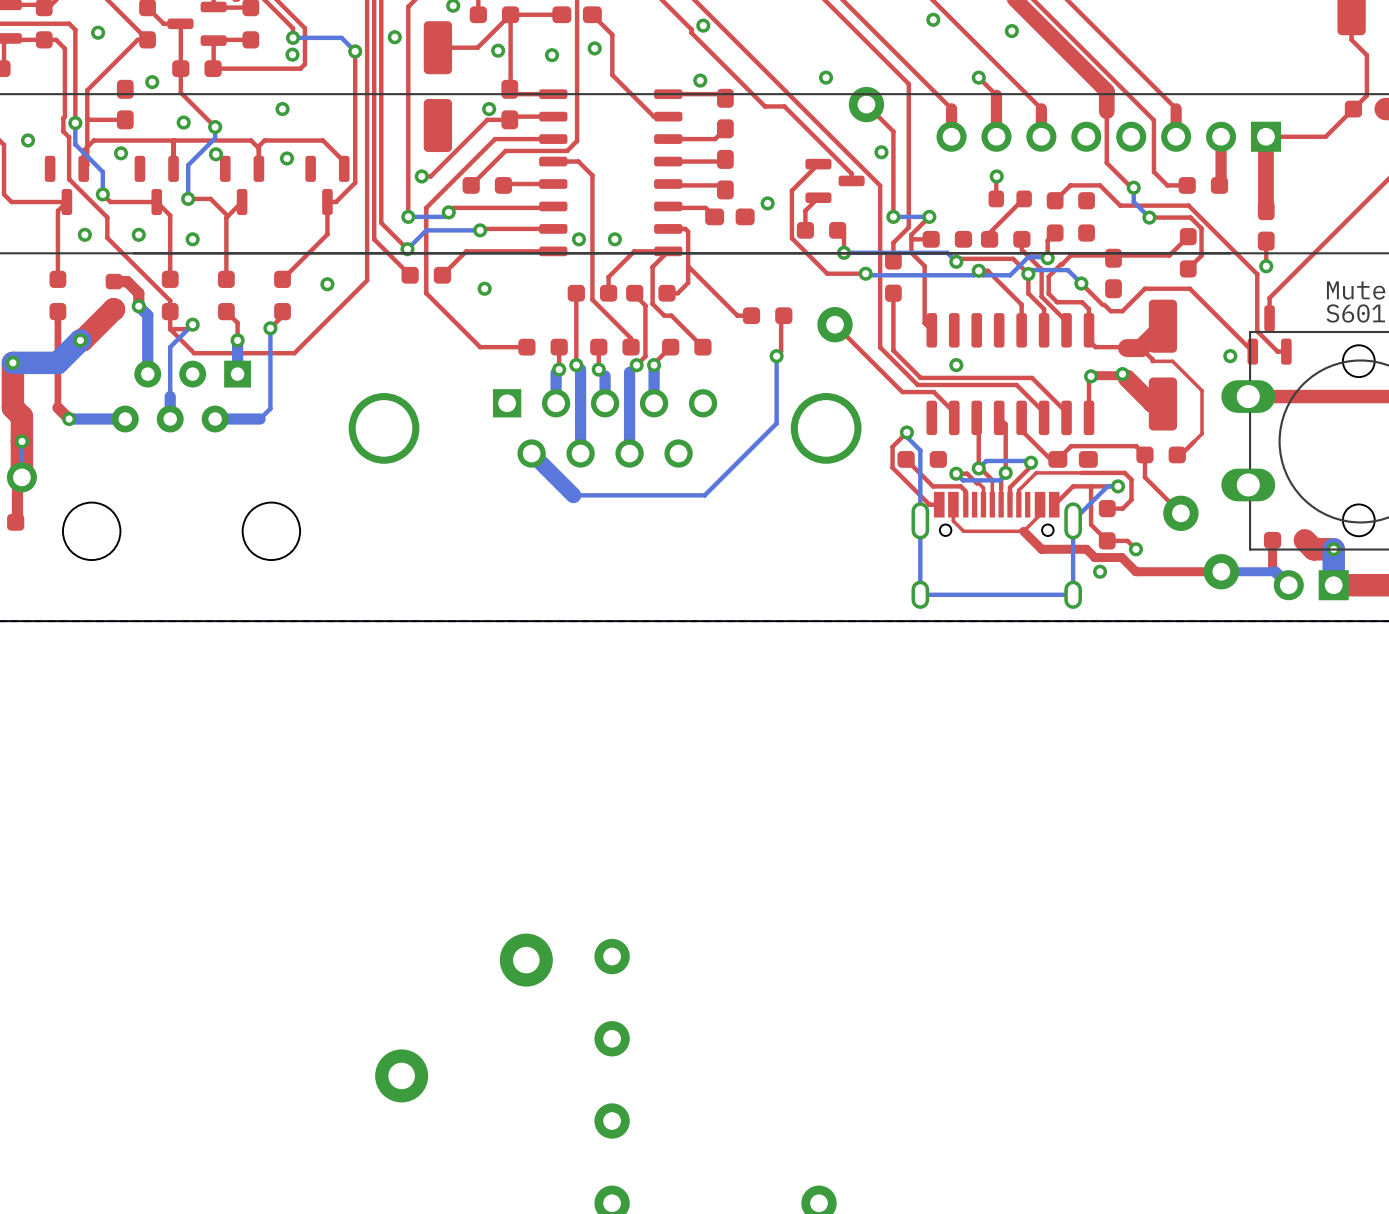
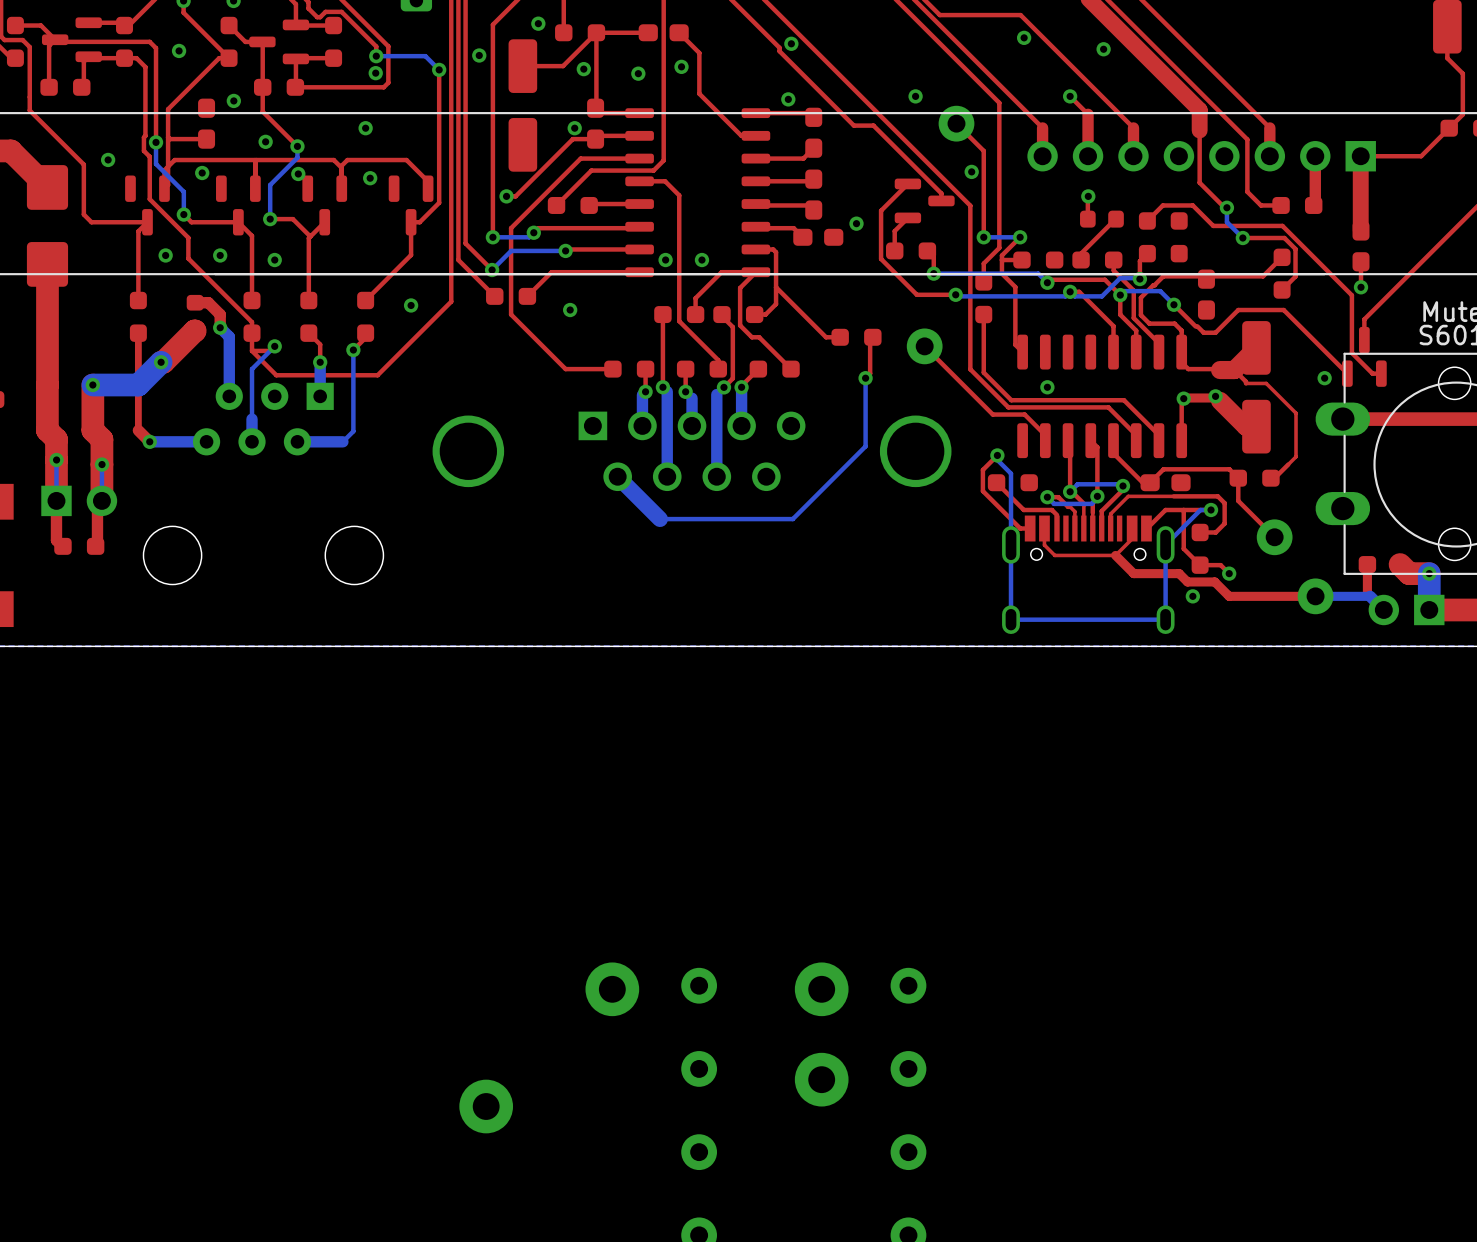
part: none -> (908, 985)
part: none -> (821, 989)
part: none -> (908, 1068)
part: none -> (821, 1079)
part: none -> (908, 1152)

